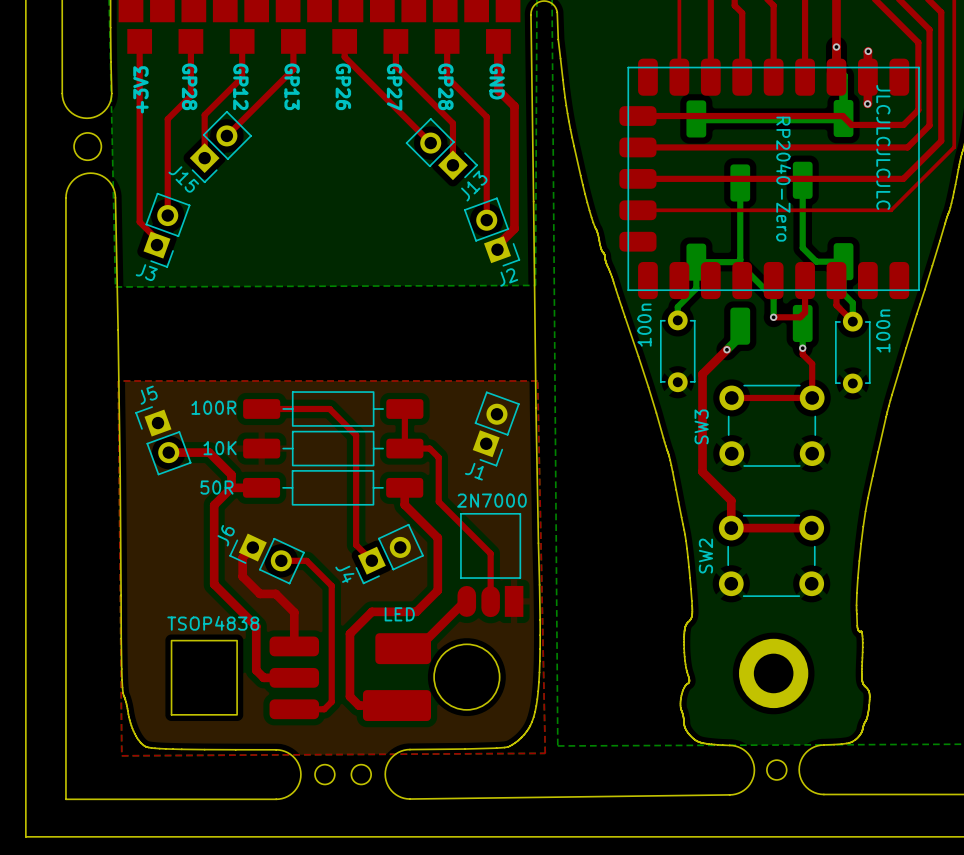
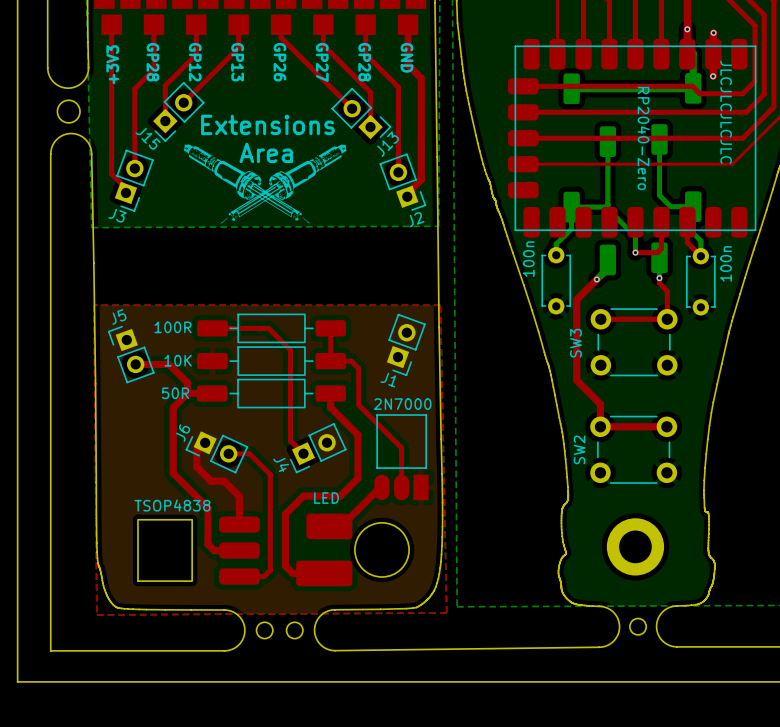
text: none -> Extensions (267, 124)
drawing: none -> [184, 144, 347, 224]
text: none -> Area (266, 152)

